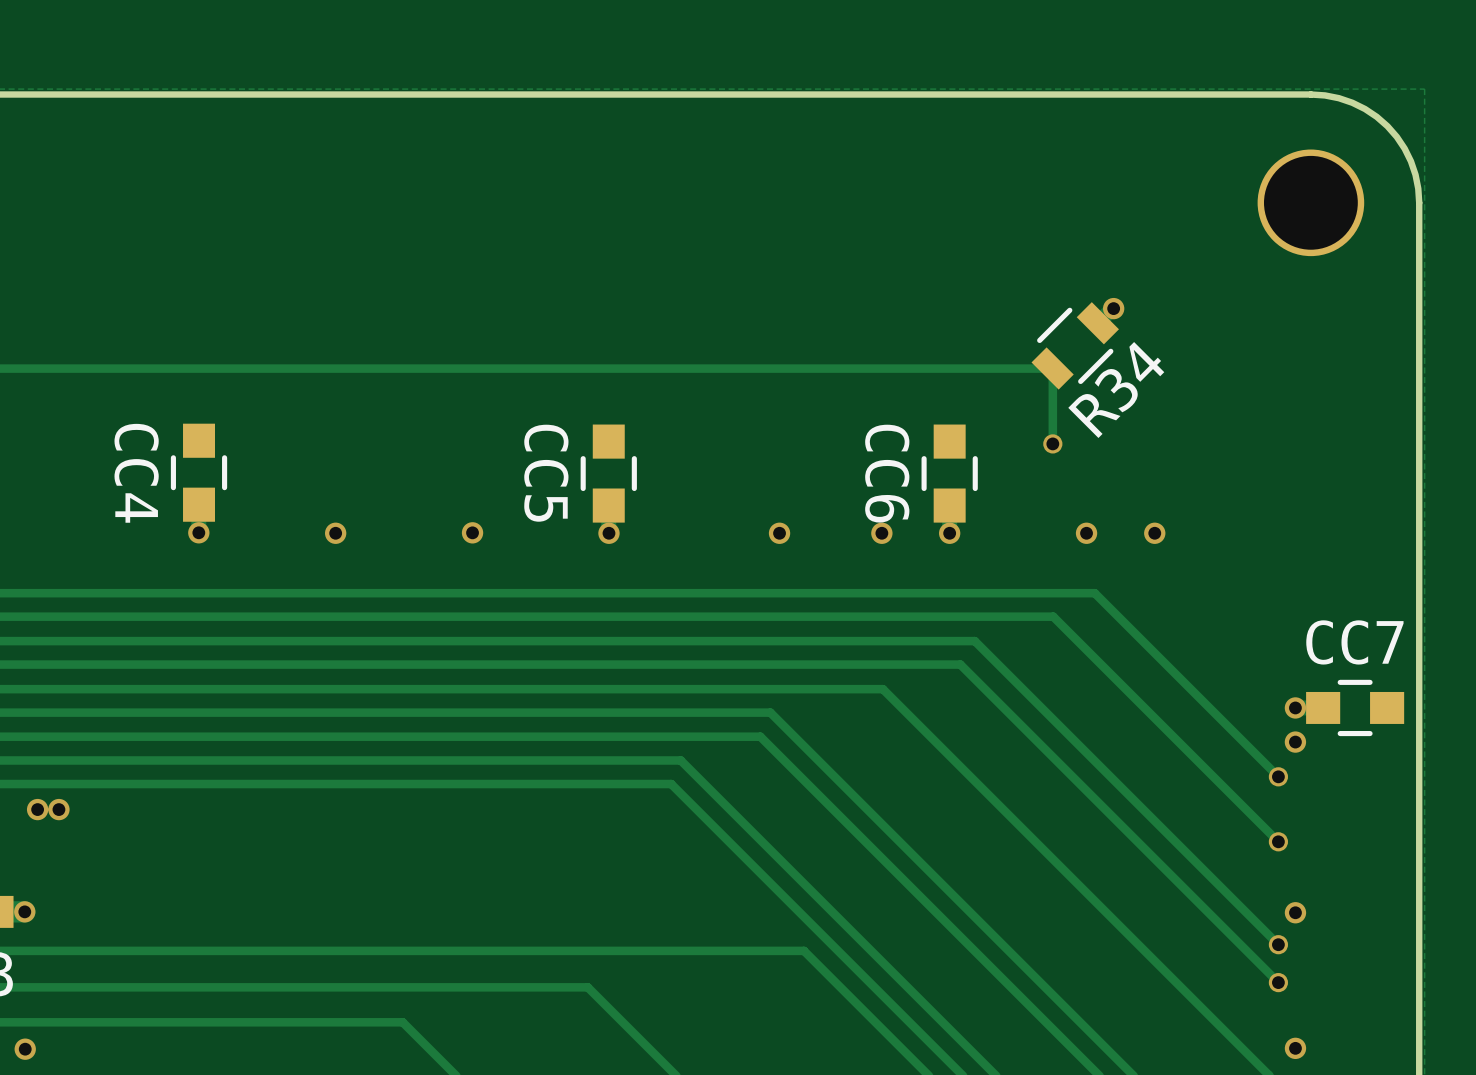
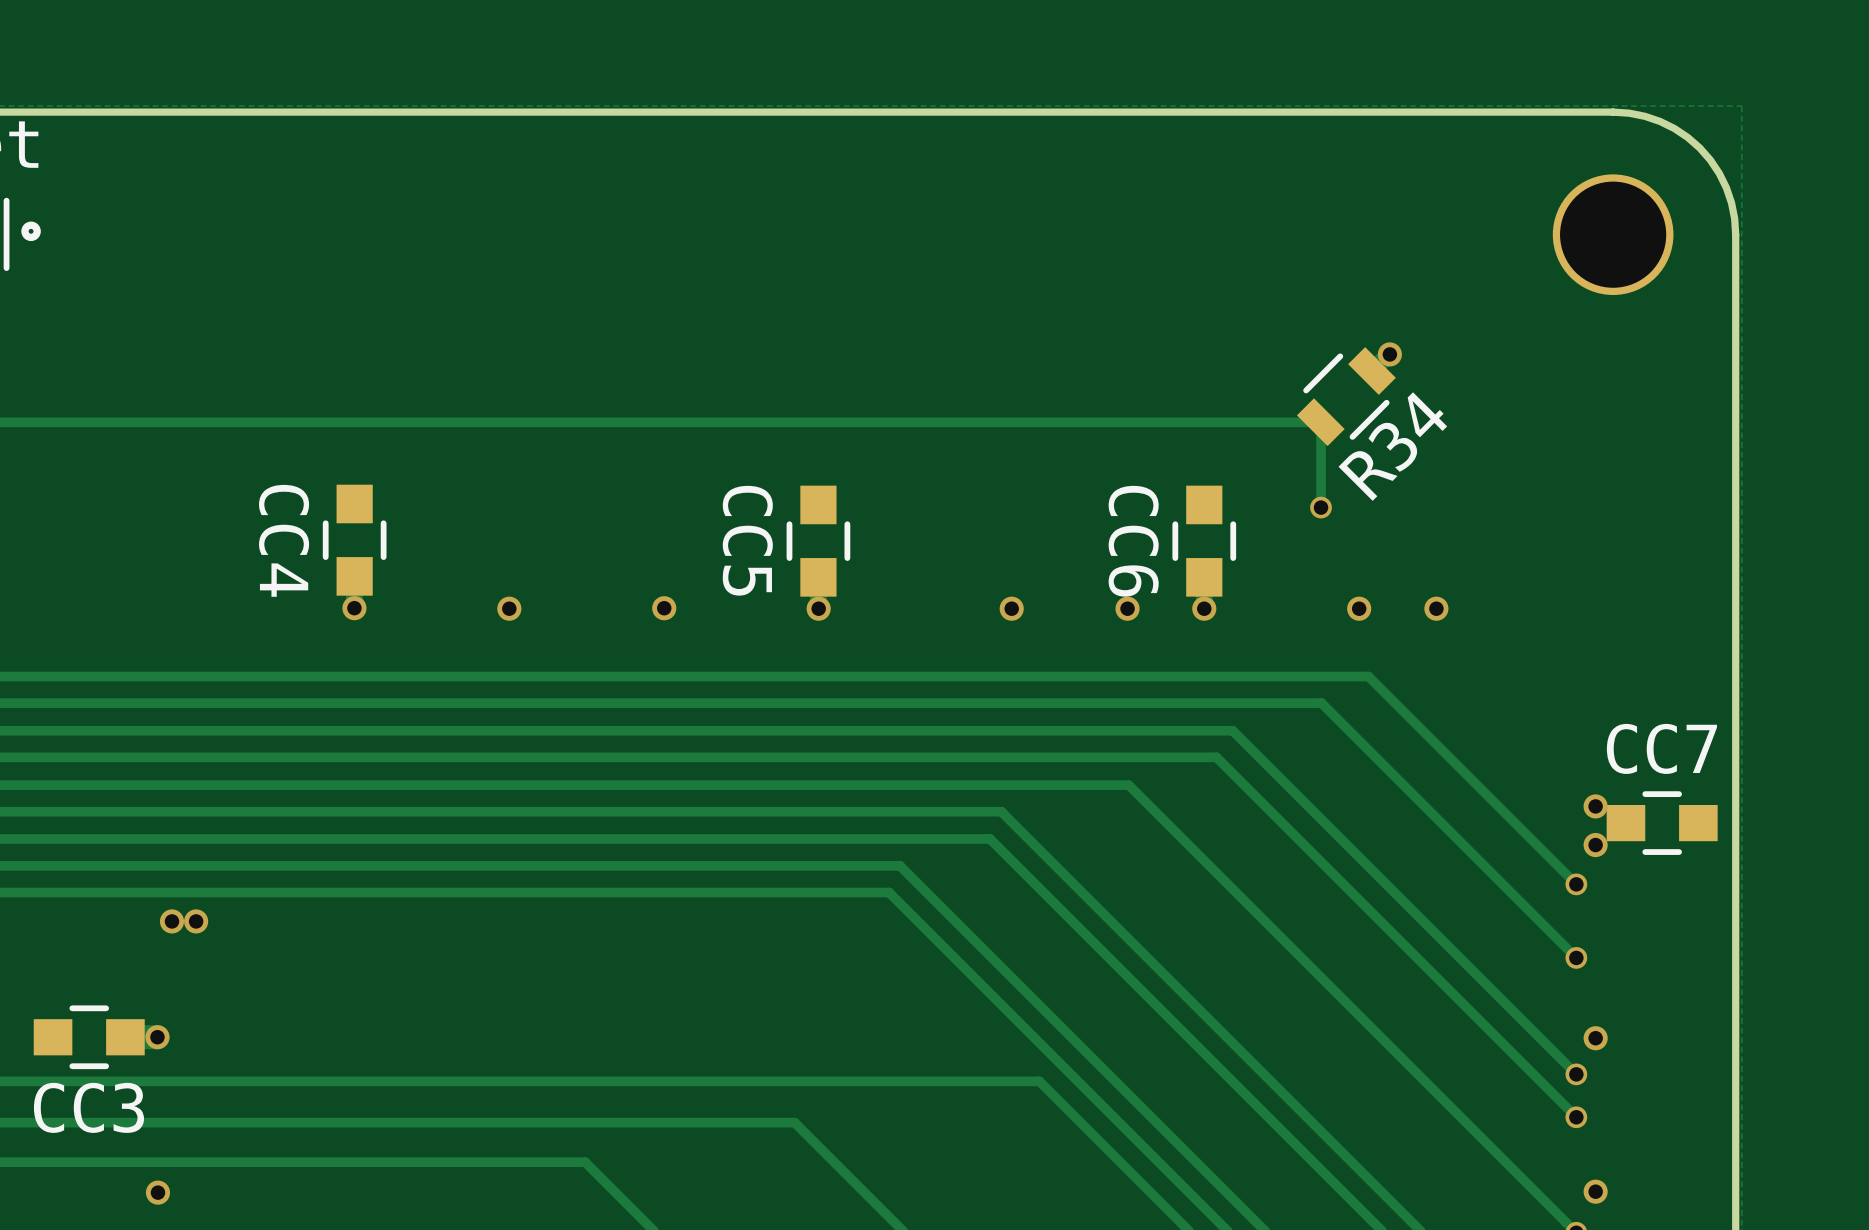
CC7 position: (1355, 707) -> (1662, 823)

